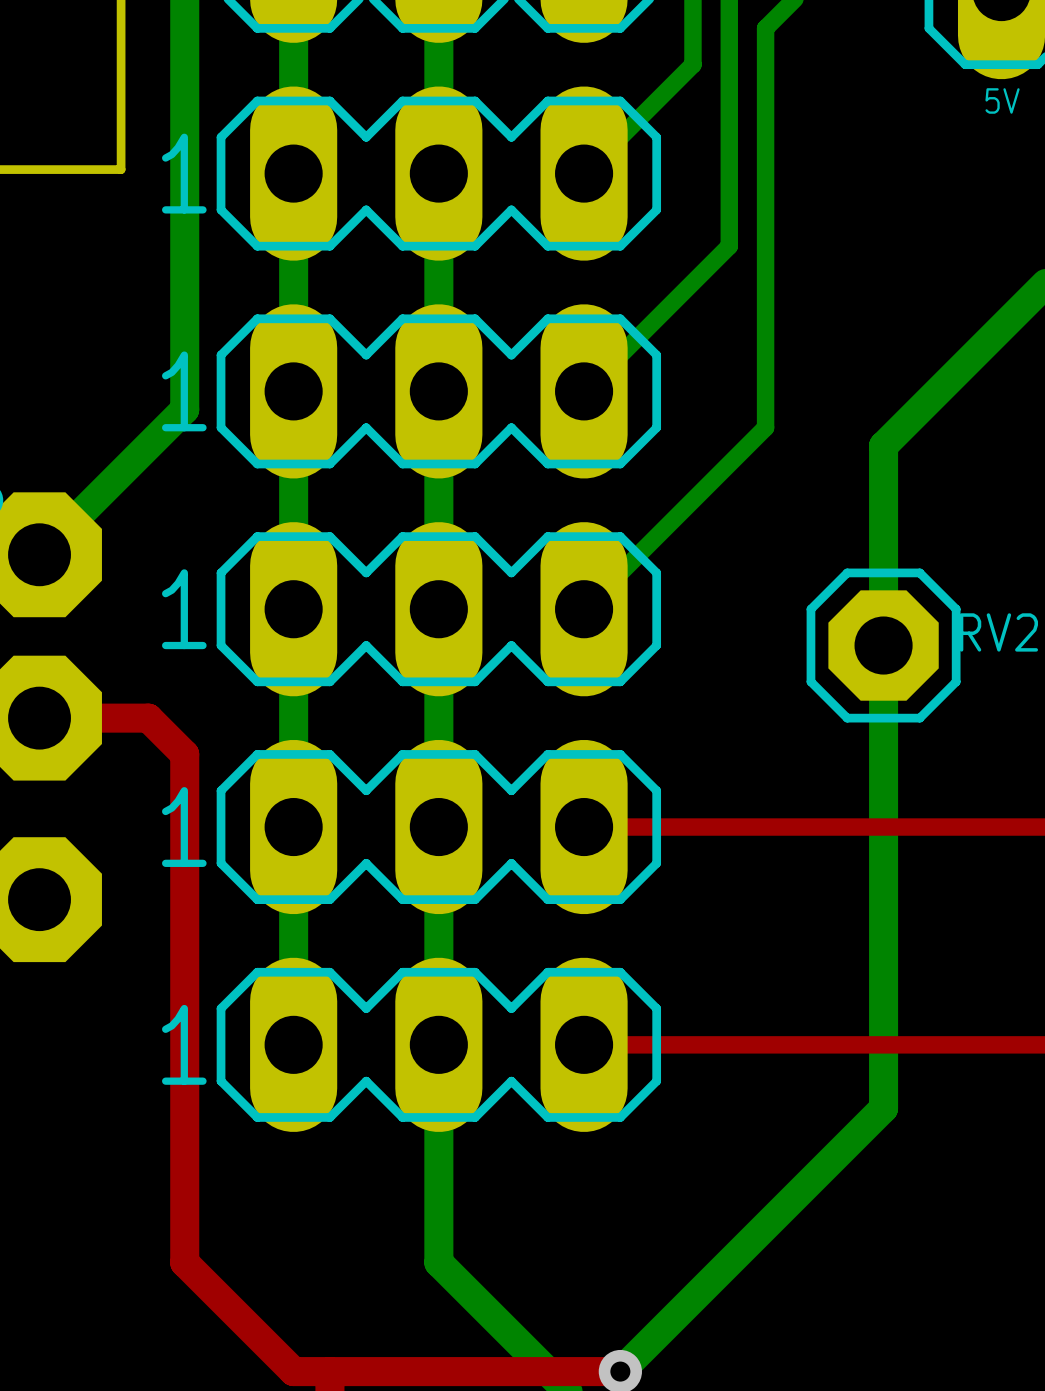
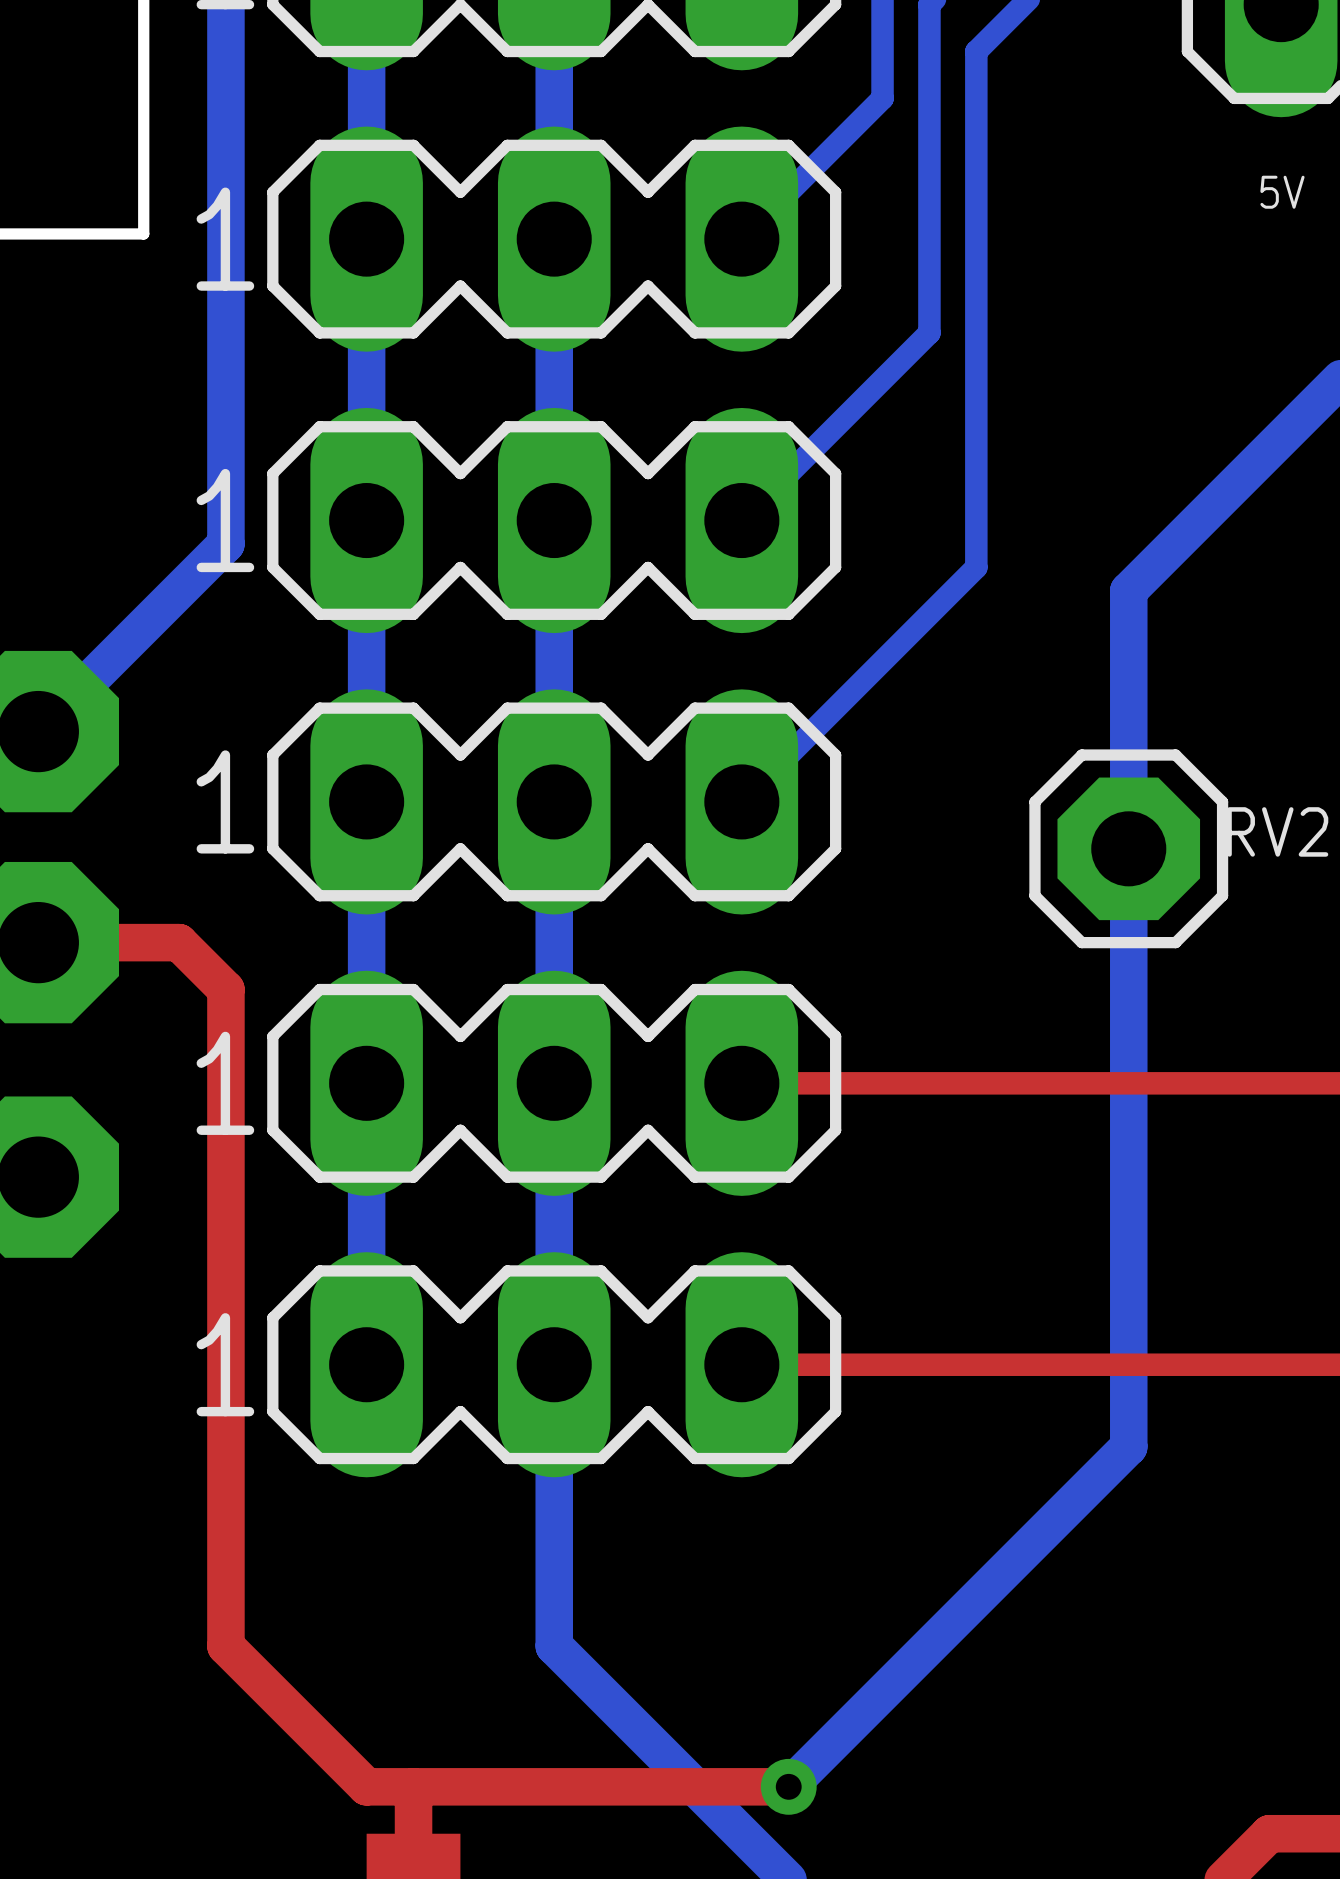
part text position: 5V (1002, 100) -> 5V (1282, 192)

